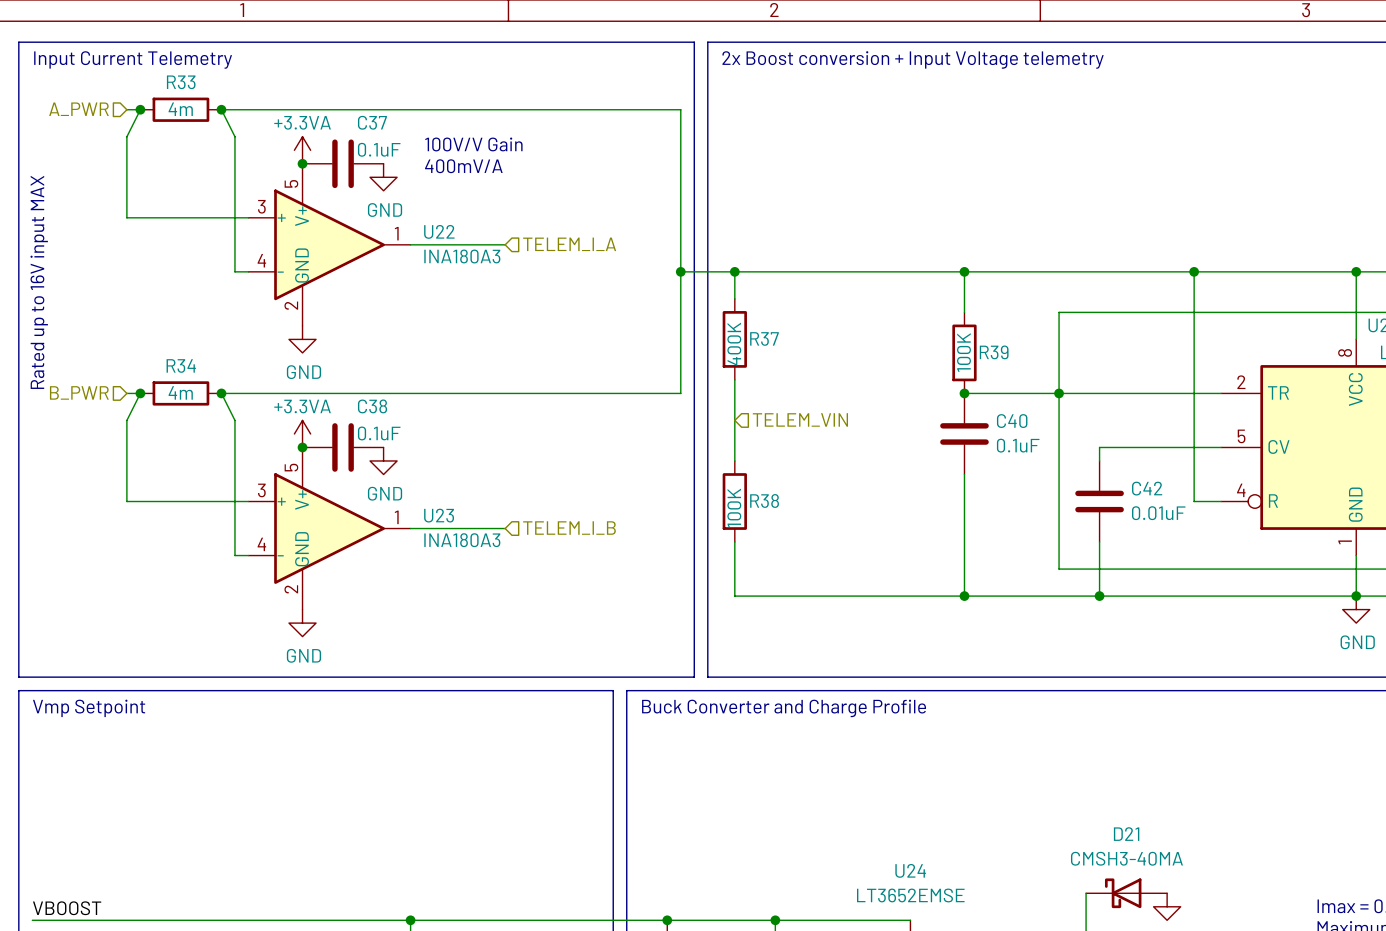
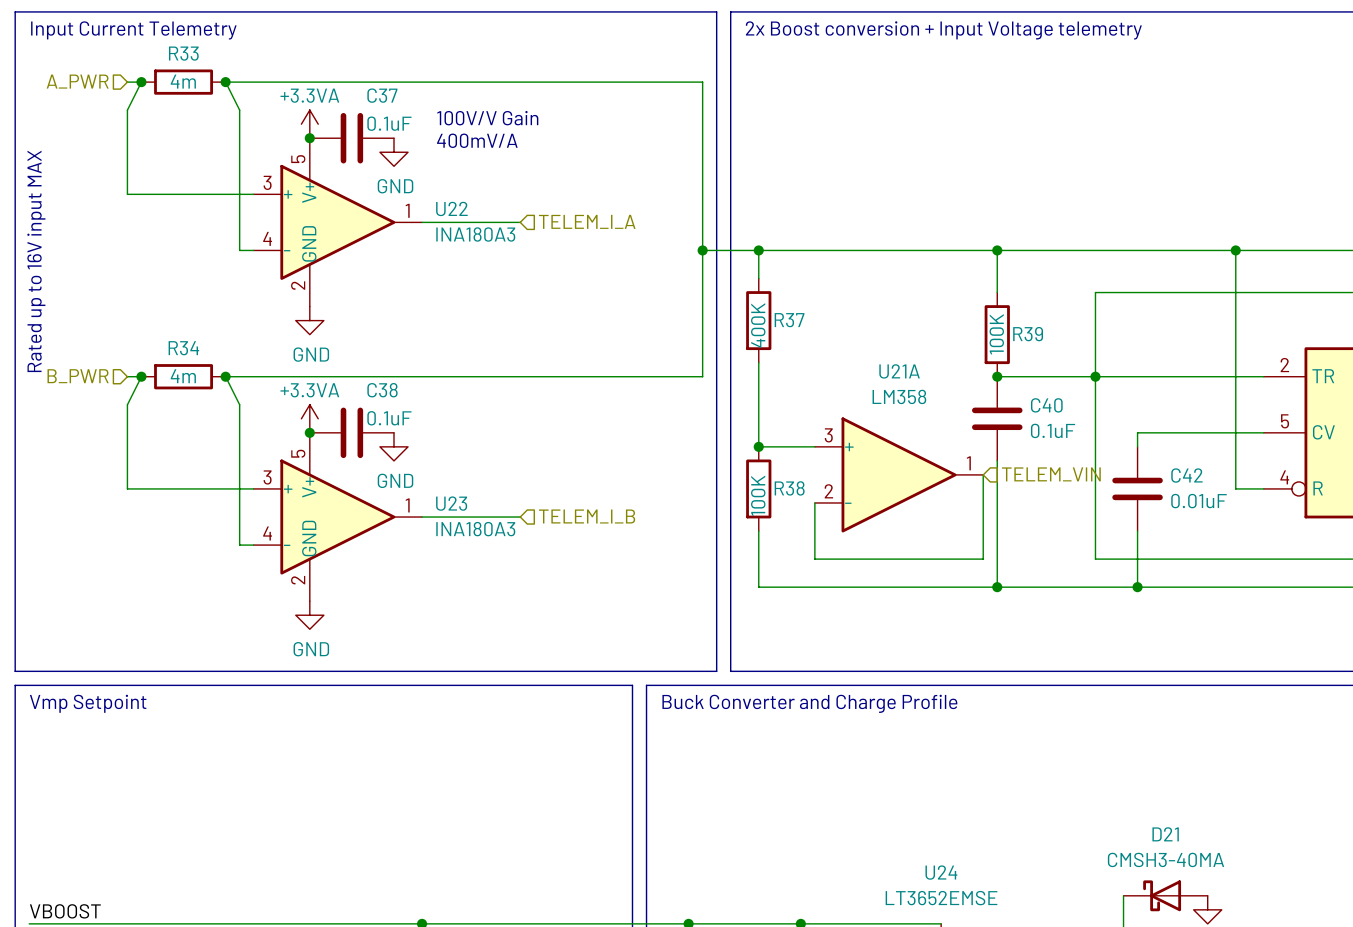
hierarchical label position: TELEM_VIN (800, 419) -> TELEM_VIN (1051, 474)
wire: none -> (758, 446) (814, 446)
junction: none -> (758, 446)
U21A: none -> LM358 (899, 474)
wire: none -> (983, 474) (983, 559) (814, 559) (814, 502)

